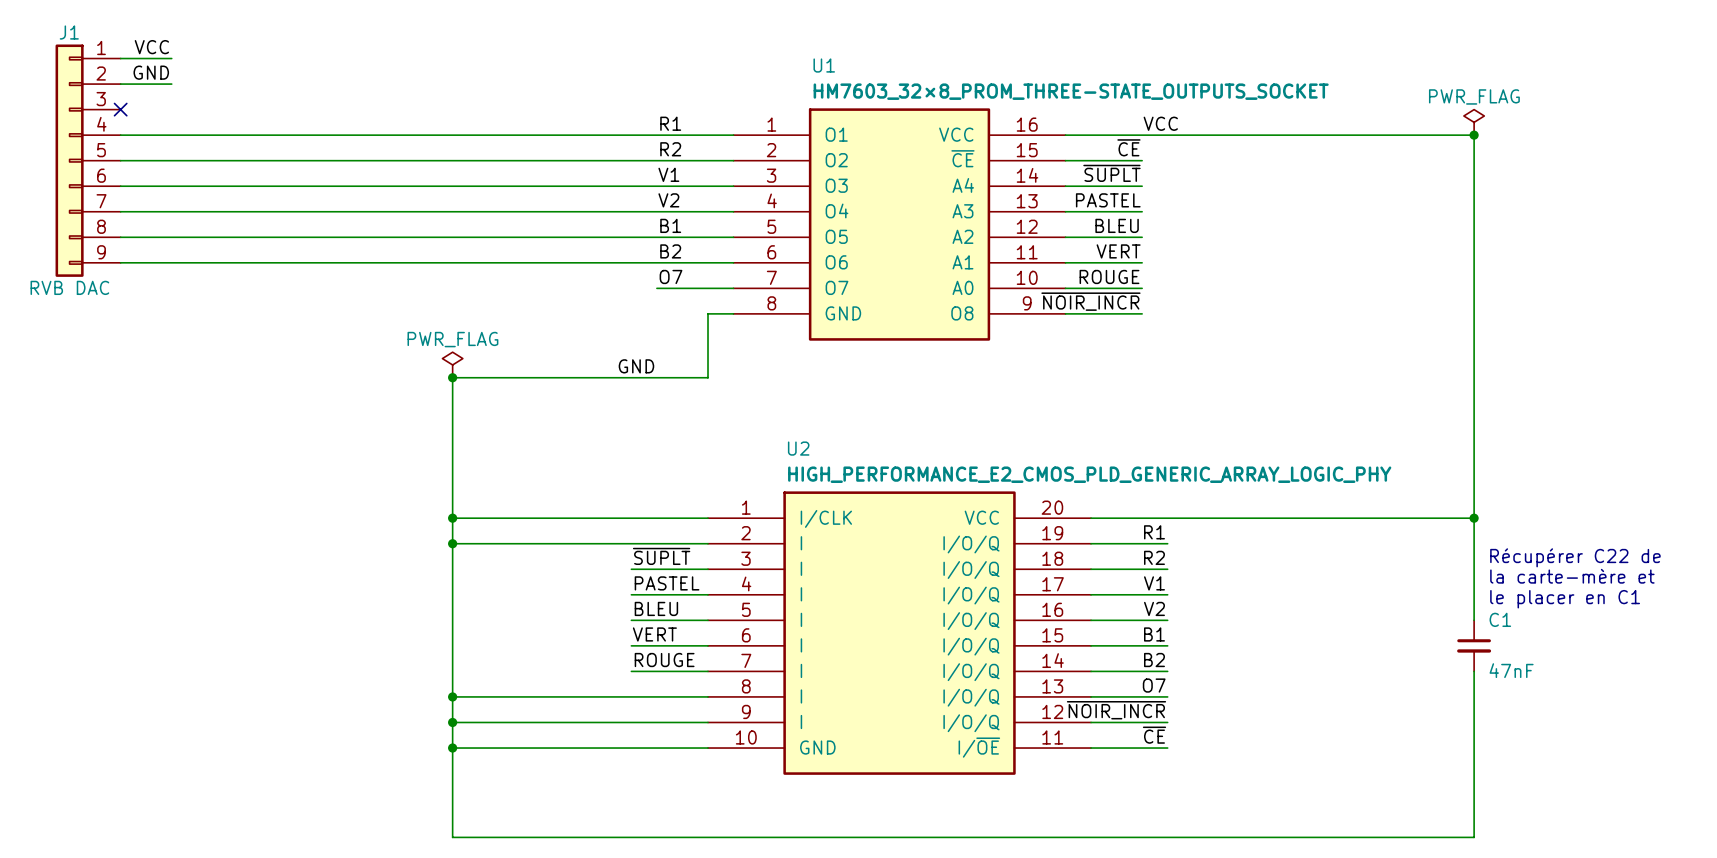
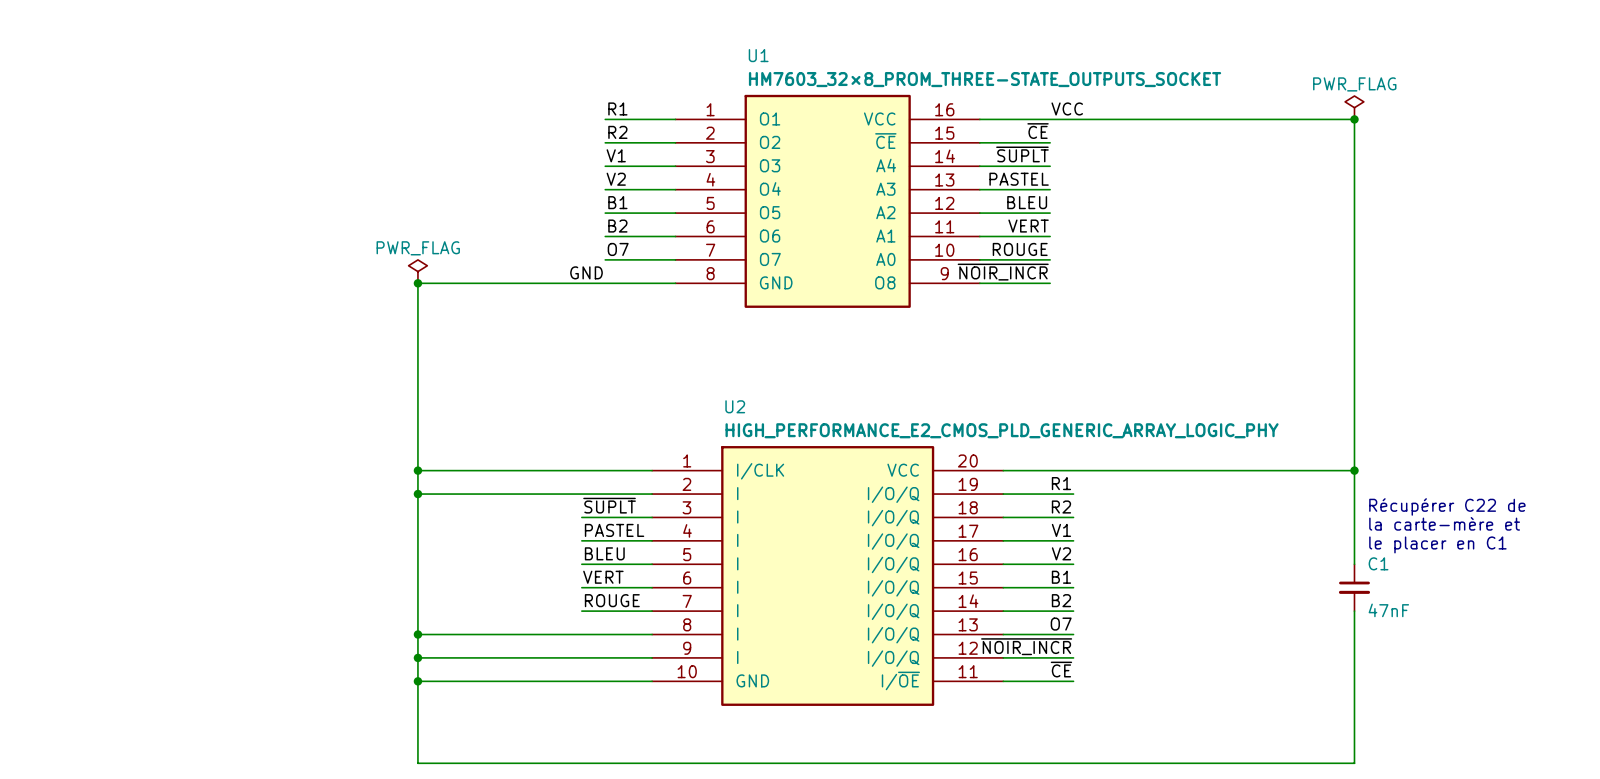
label: VCC (151, 47) -> none
wire: (120, 58) (171, 58) -> none
label: GND (151, 72) -> none
wire: (120, 84) (171, 84) -> none
no-connect mark: (120, 109) -> none
wire: (120, 135) (656, 135) -> none
J1: RVB DAC (88, 160) -> none
wire: (120, 160) (656, 160) -> none
wire: (120, 186) (656, 186) -> none
wire: (120, 211) (656, 211) -> none
wire: (120, 237) (656, 237) -> none
wire: (120, 262) (656, 262) -> none
junction: none -> (417, 283)
wire: (708, 313) (708, 377) (452, 377) -> (652, 283) (417, 283) (417, 341)
power symbol position: PWR_FLAG (452, 364) -> PWR_FLAG (417, 271)
label position: GND (636, 366) -> GND (586, 272)
junction: (452, 377) -> none

